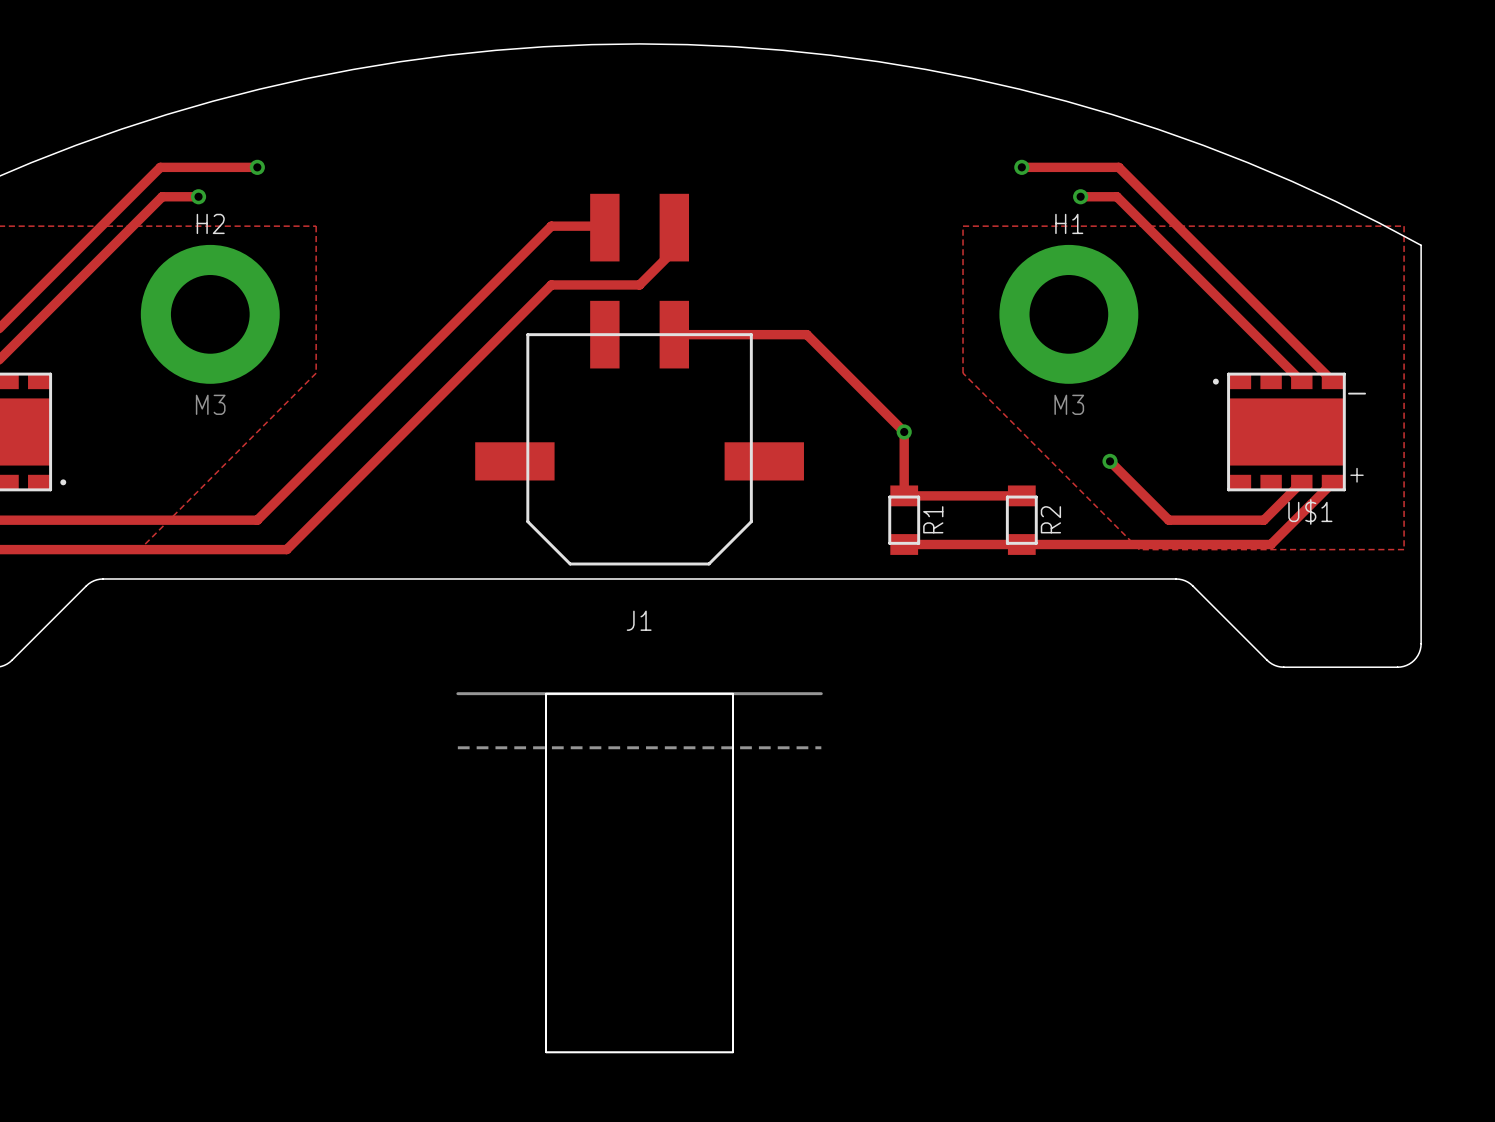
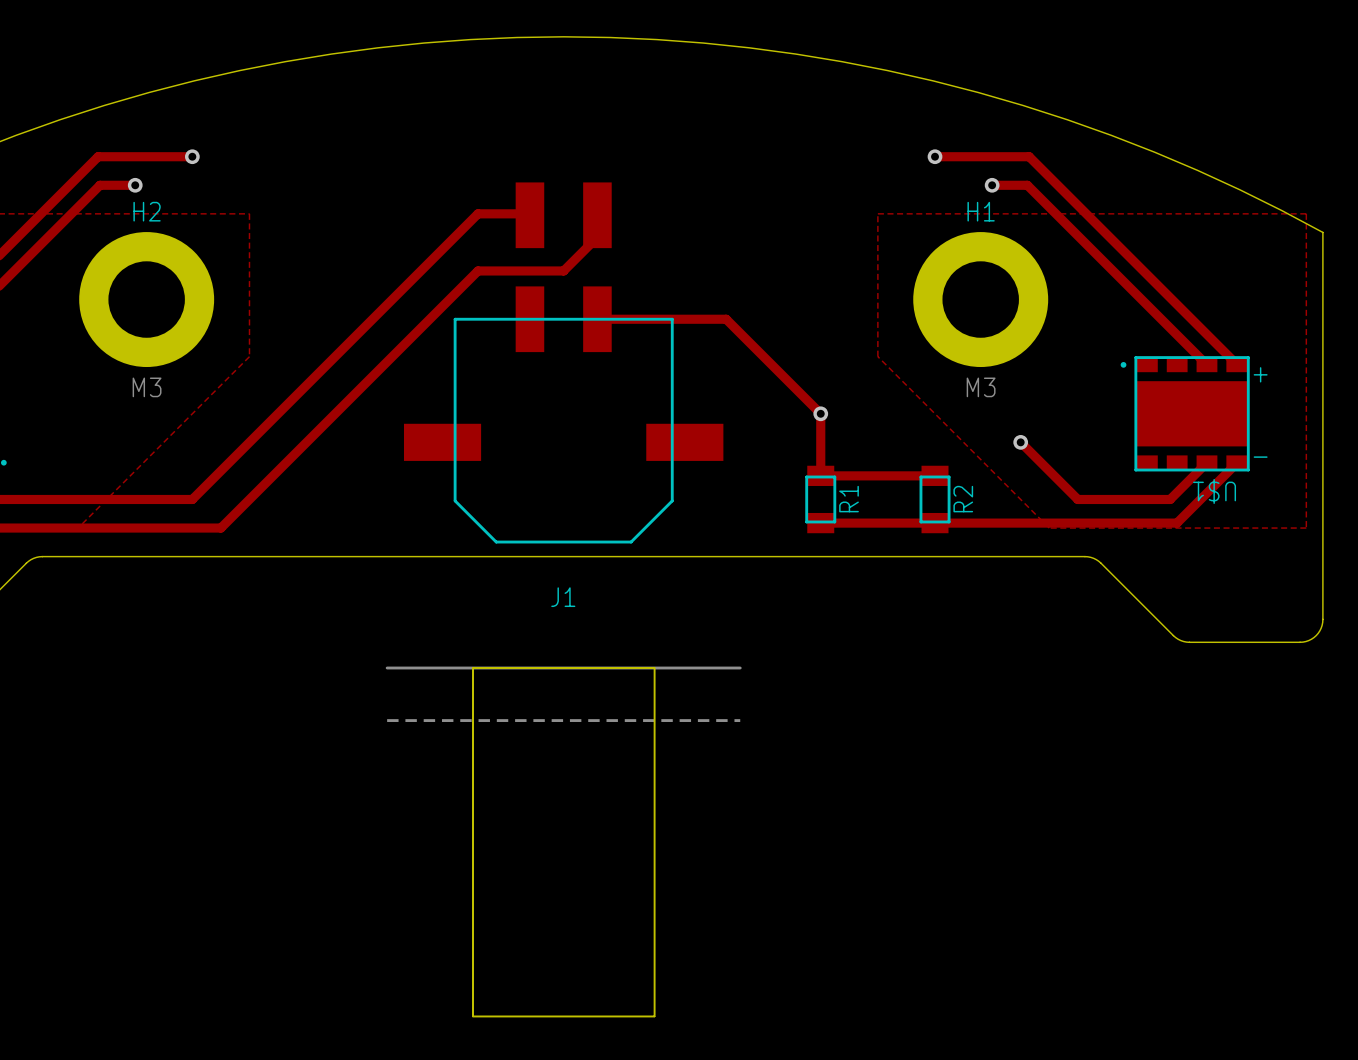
U$1 text position: - (1357, 393) -> - (1260, 457)
U$1 text position: + (1357, 475) -> + (1260, 374)
U$1 name rotation: 0° (1310, 511) -> 180° (1214, 491)

